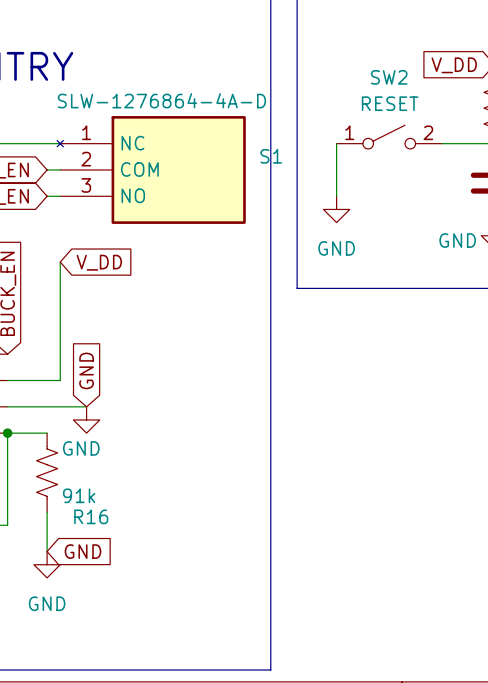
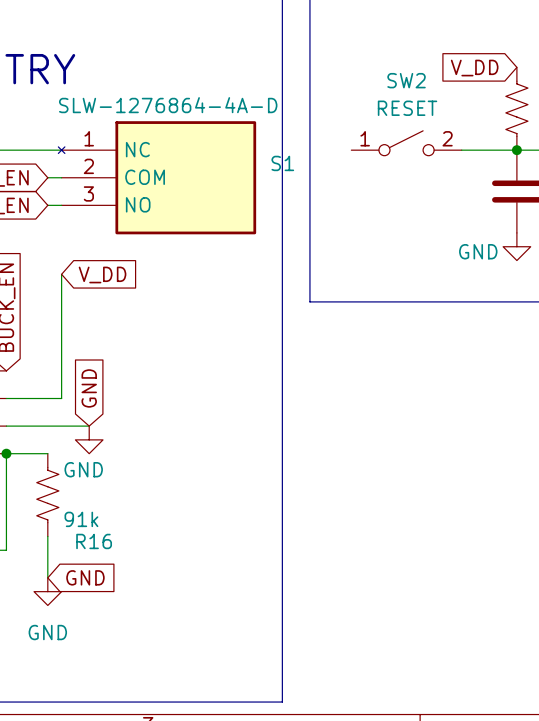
wire: (336, 143) (336, 196) -> none
power symbol: GND (336, 209) -> none

